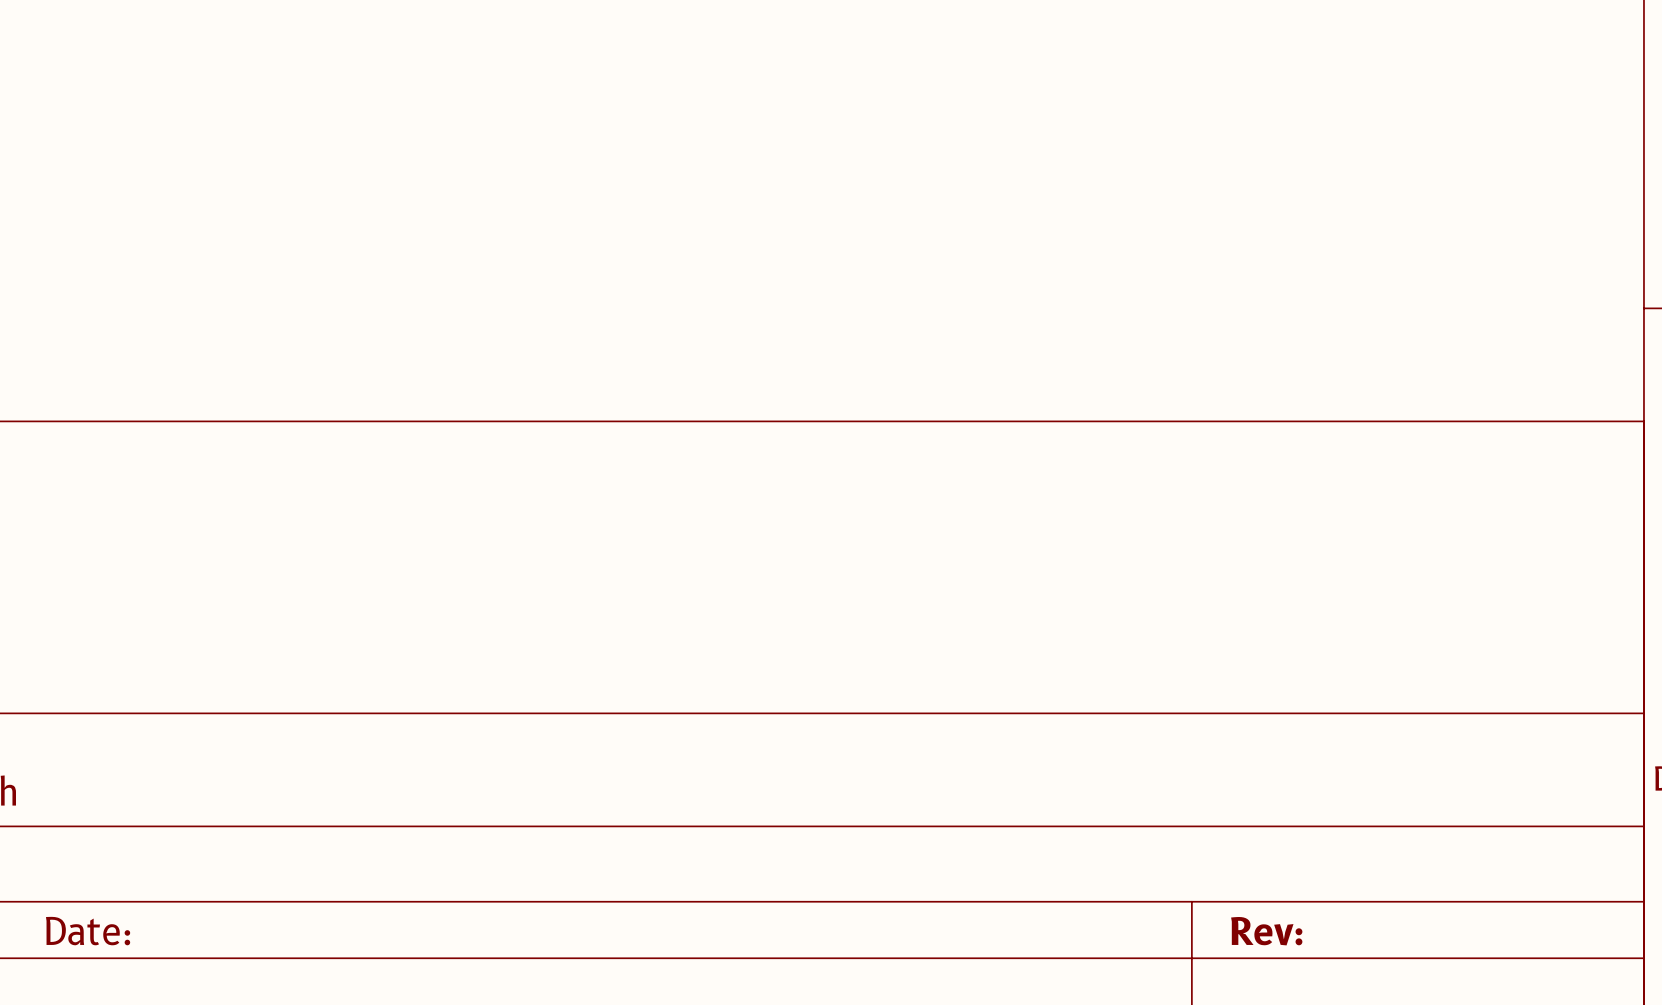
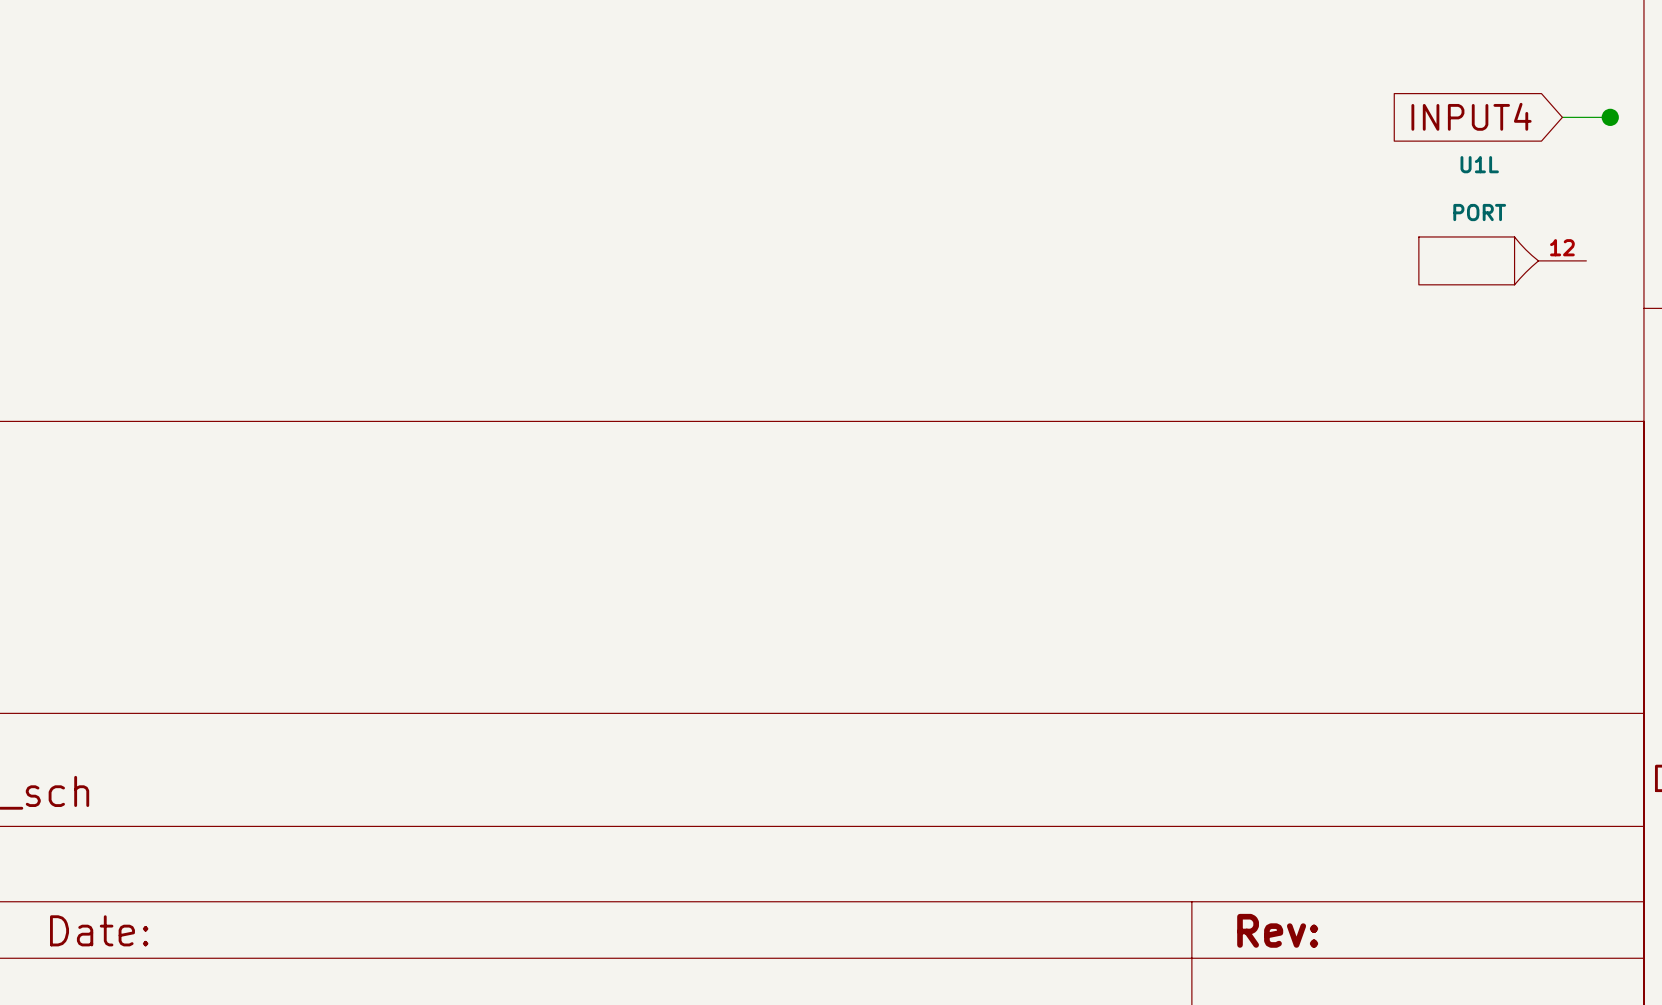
global label: none -> INPUT4 (1471, 116)
wire: none -> (1562, 117) (1610, 117)
junction: none -> (1610, 117)
U1L: none -> PORT (1502, 260)

